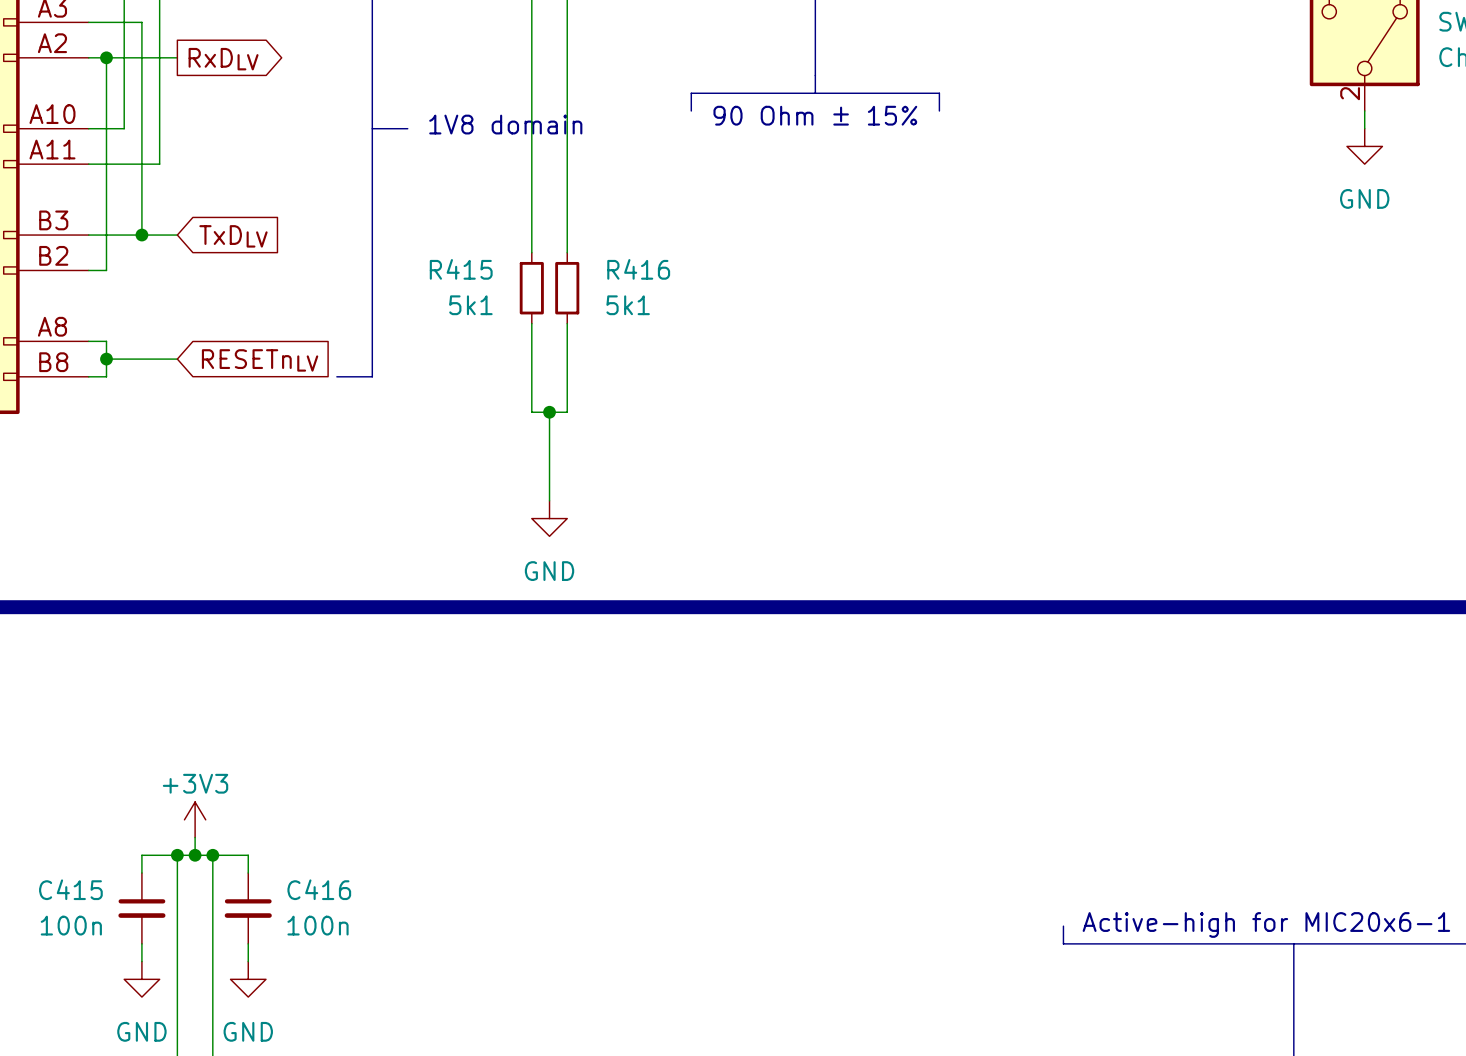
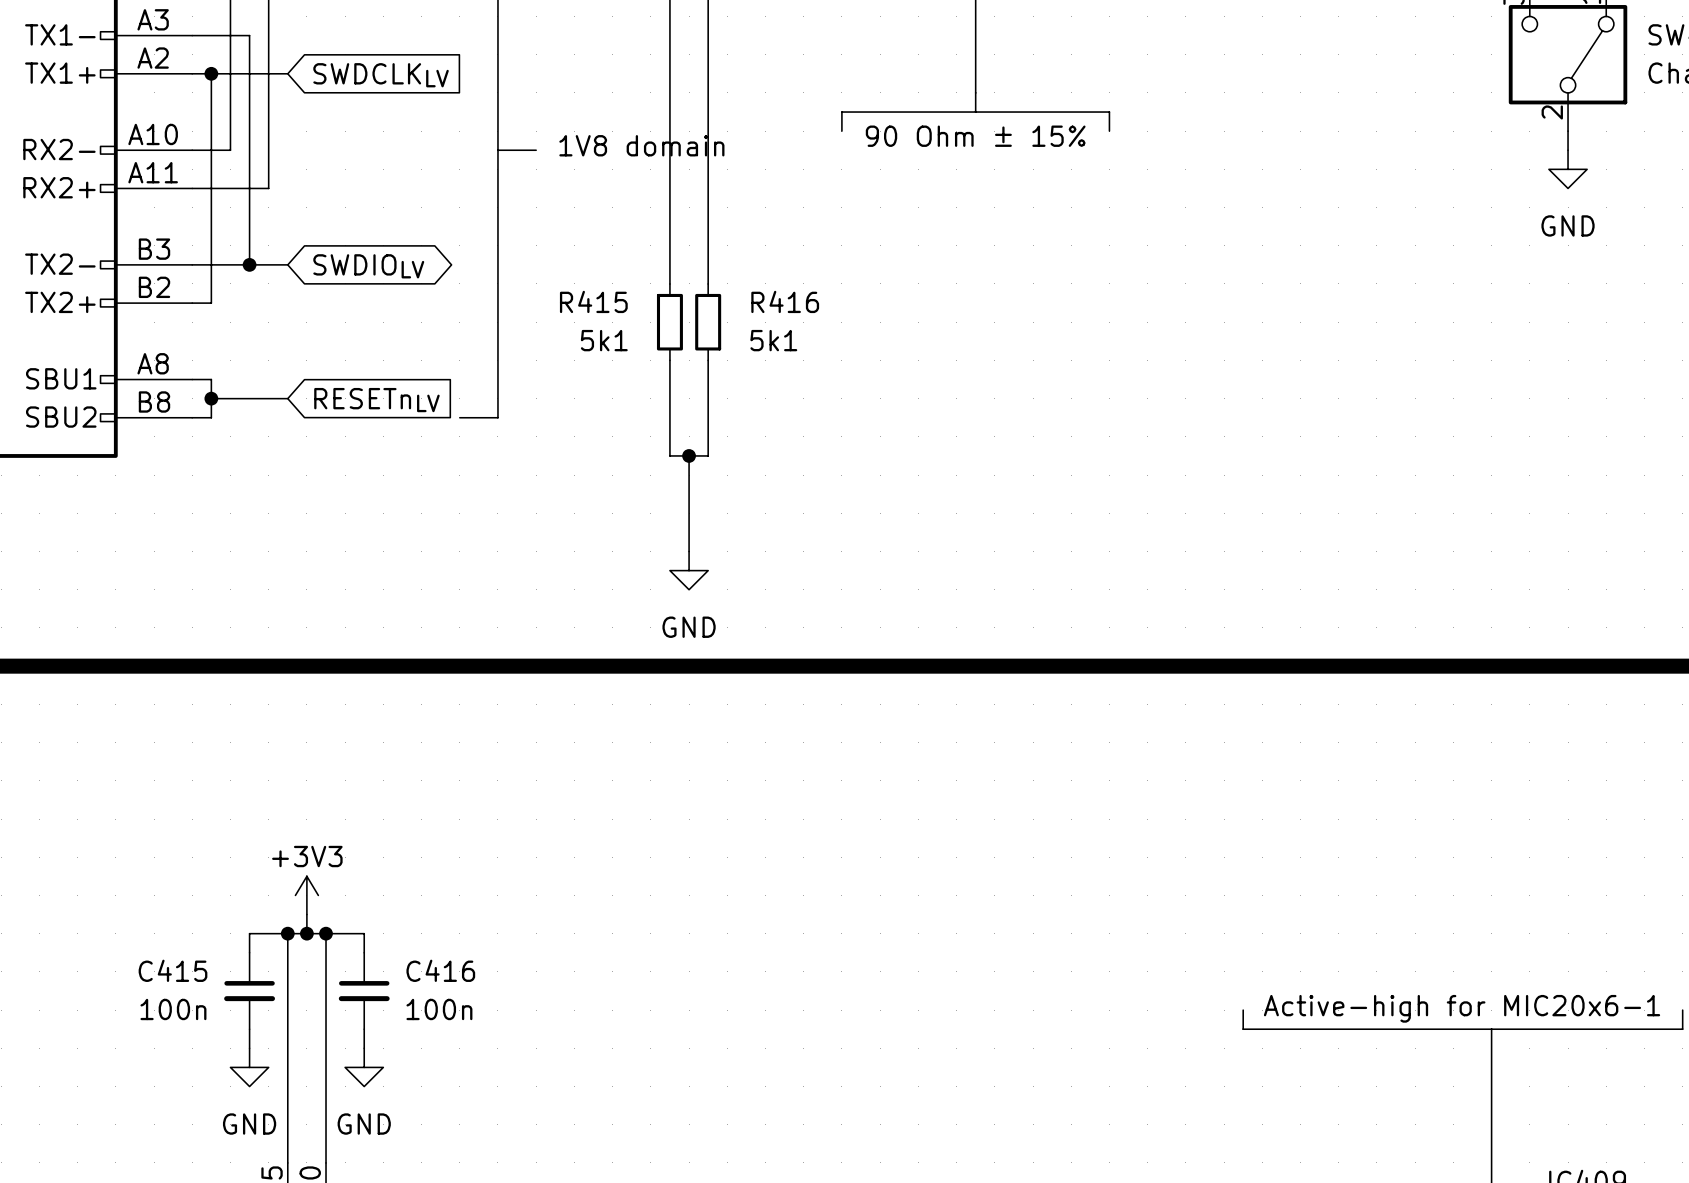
global label shape: output (223, 59) -> input (381, 75)
global label: RxDLV (223, 59) -> SWDCLKLV (381, 75)
global label shape: input (233, 236) -> bidirectional (368, 266)
global label: TxDLV (233, 236) -> SWDIOLV (368, 266)

